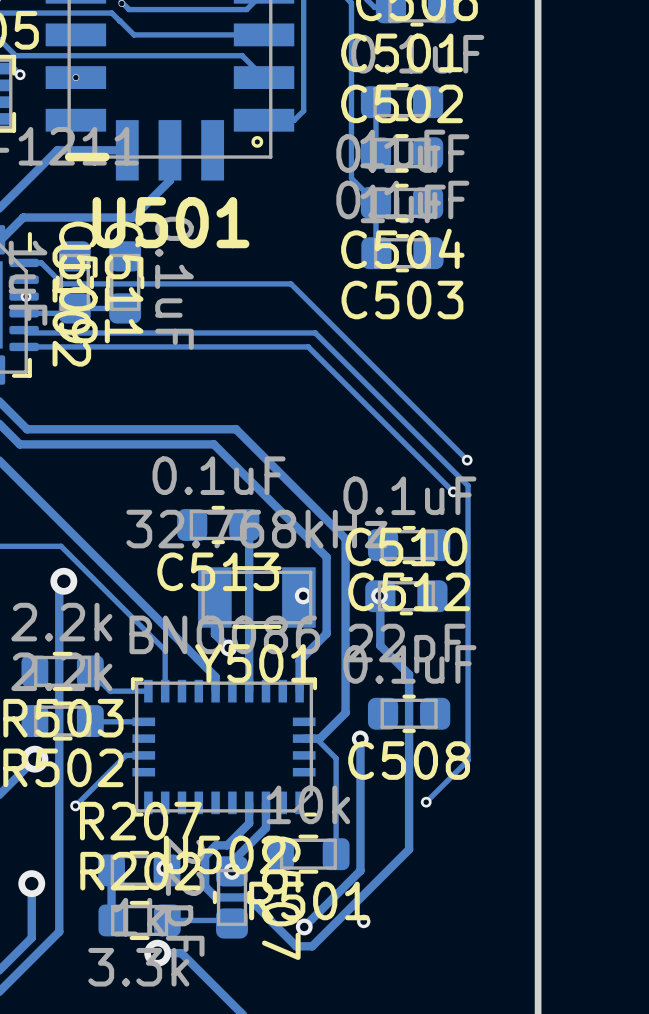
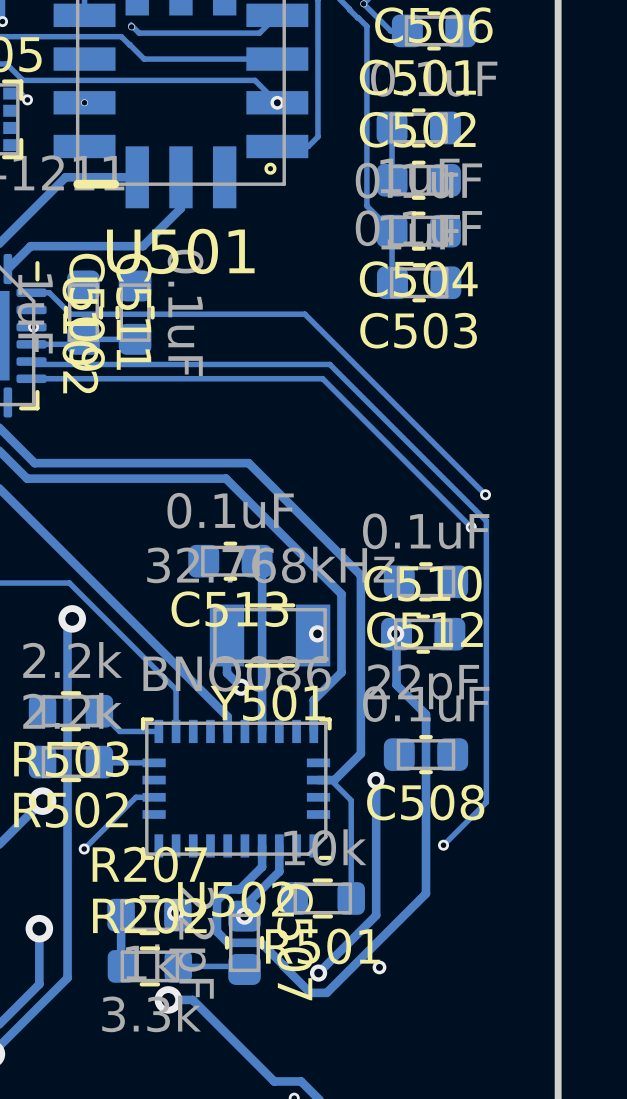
via: none -> (277, 102)

